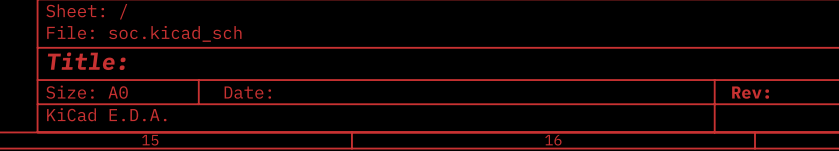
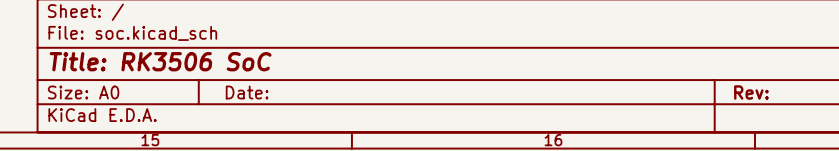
title block: Title: (86, 61) -> Title: RK3506 SoC (160, 61)

